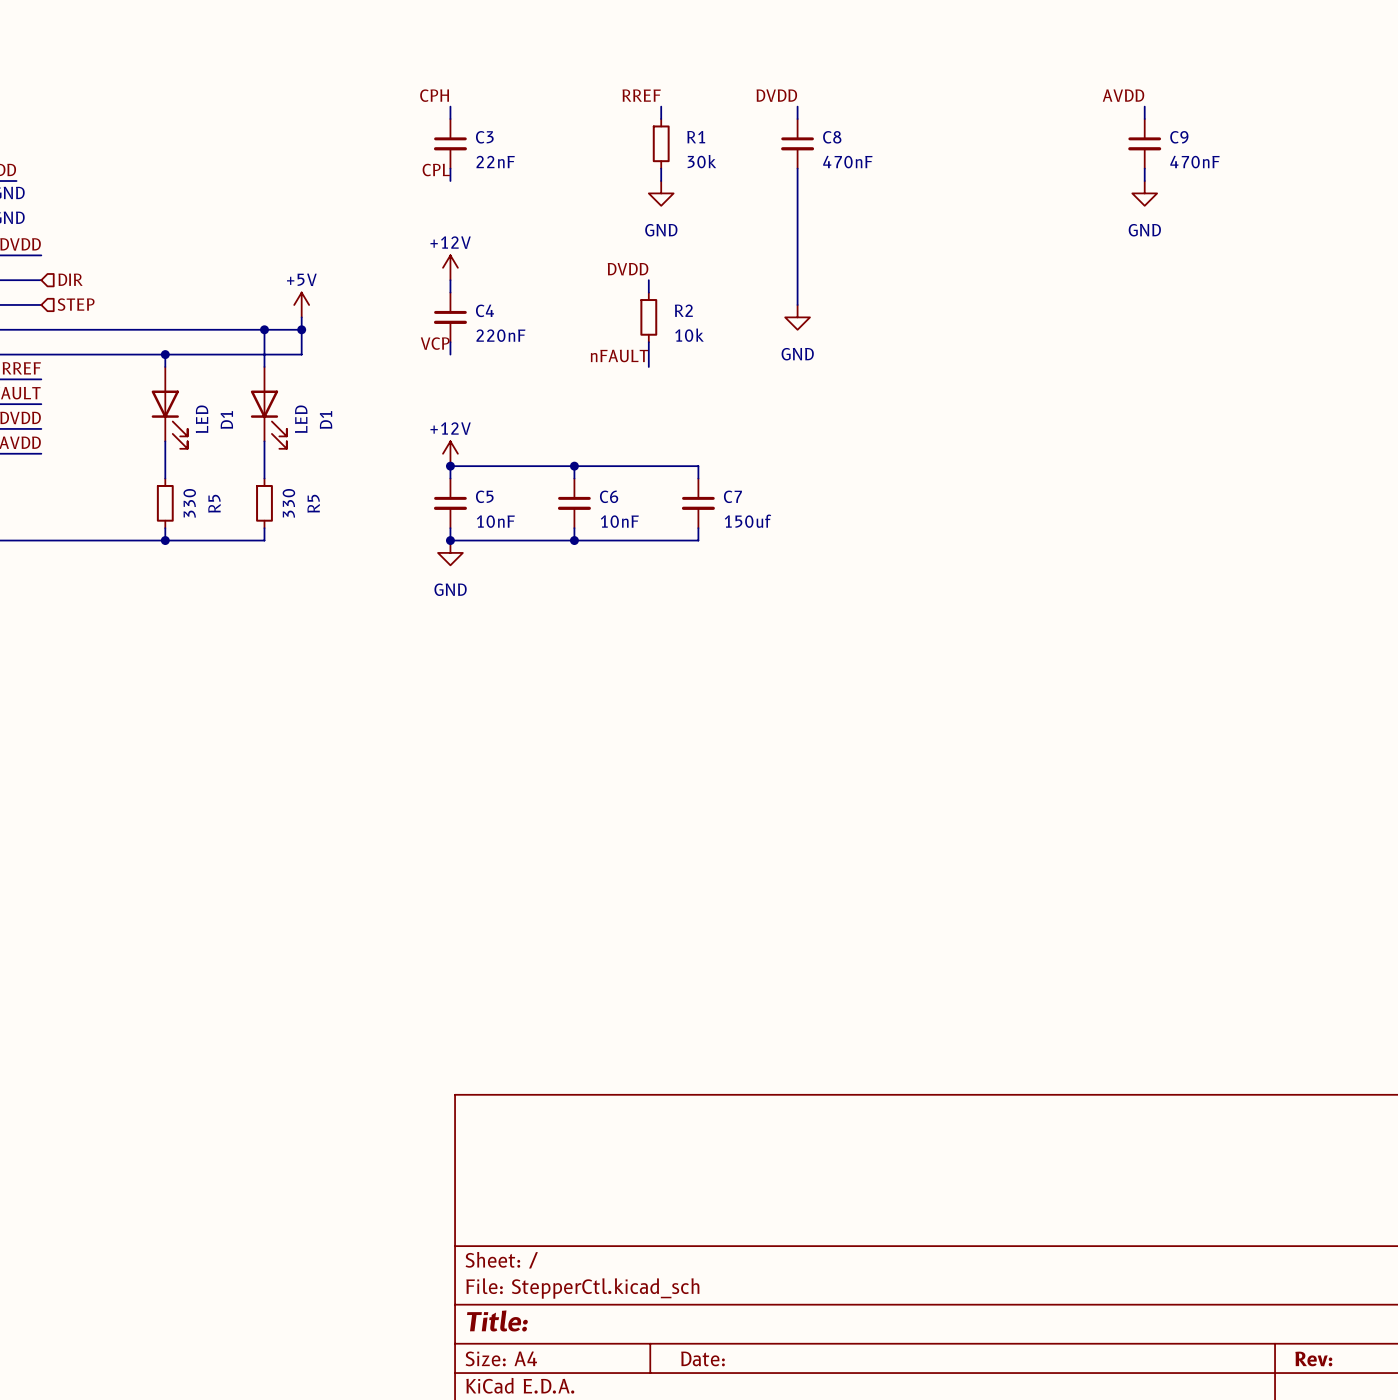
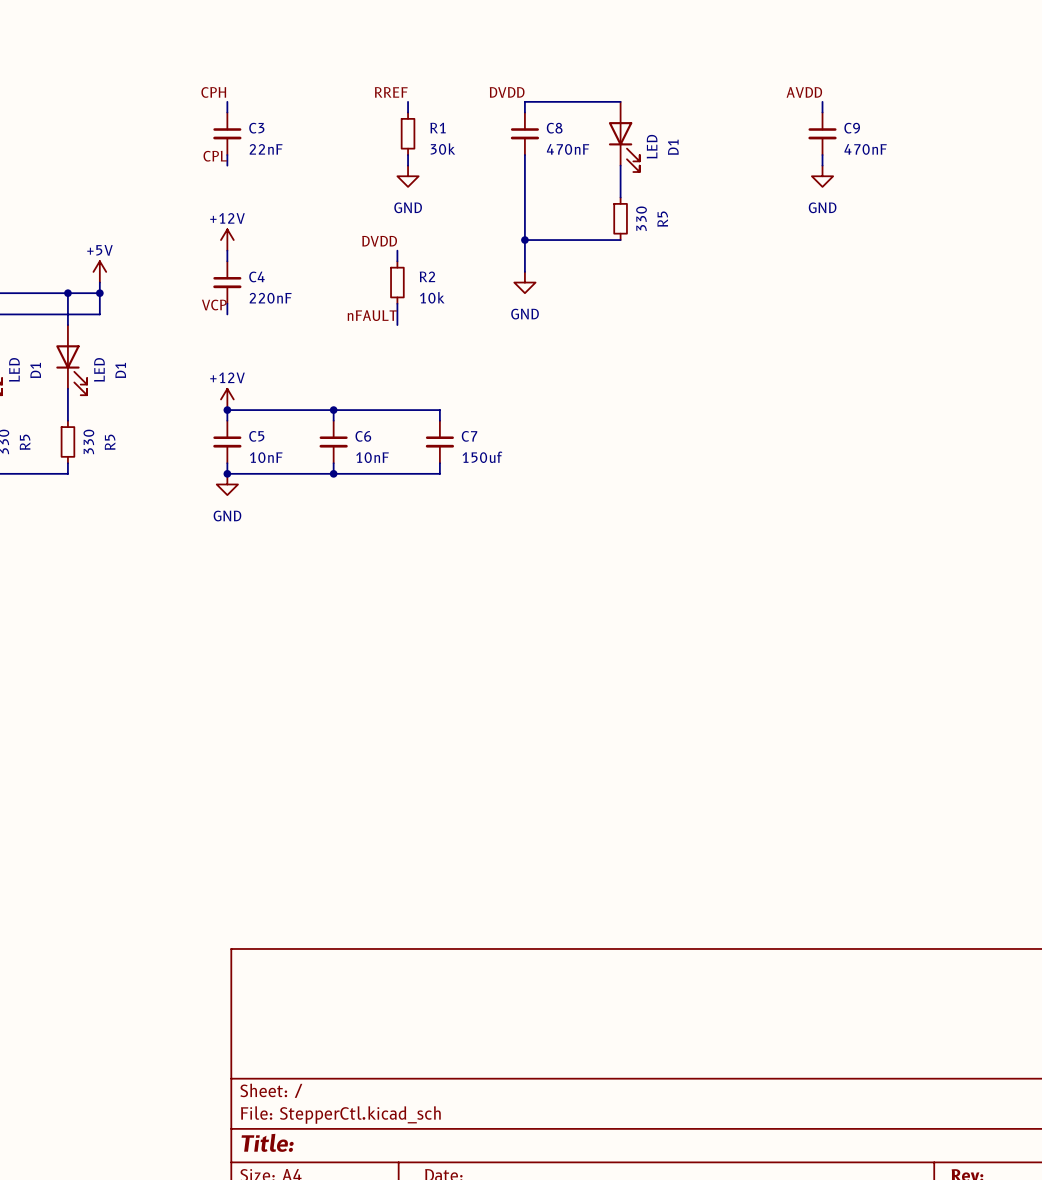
wire: none -> (524, 101) (620, 101)
D1: none -> LED (624, 136)
wire: none -> (620, 165) (620, 197)
R5: none -> 330 (620, 218)
wire: none -> (524, 240) (620, 240)
junction: none -> (524, 240)

